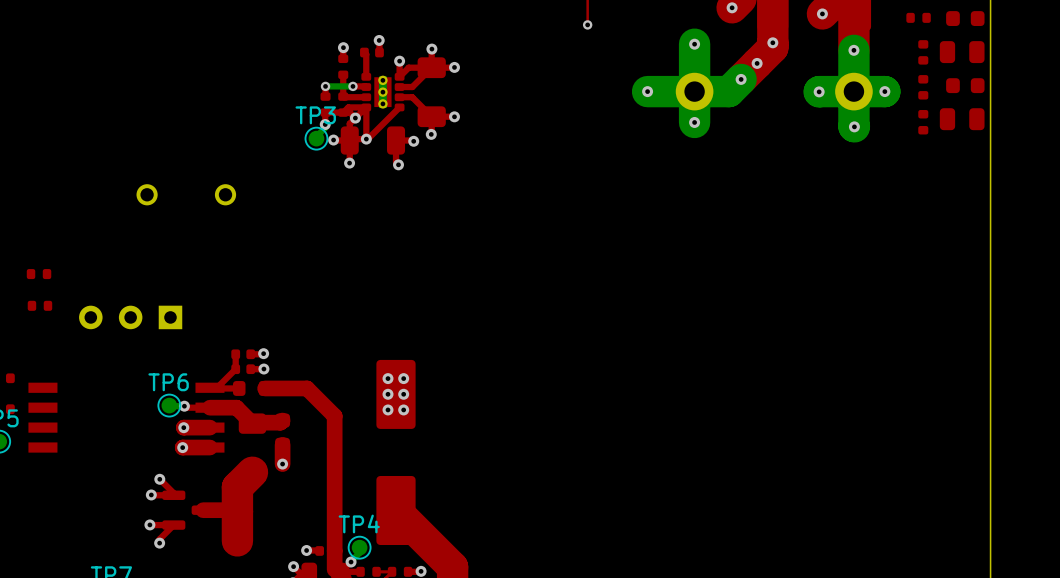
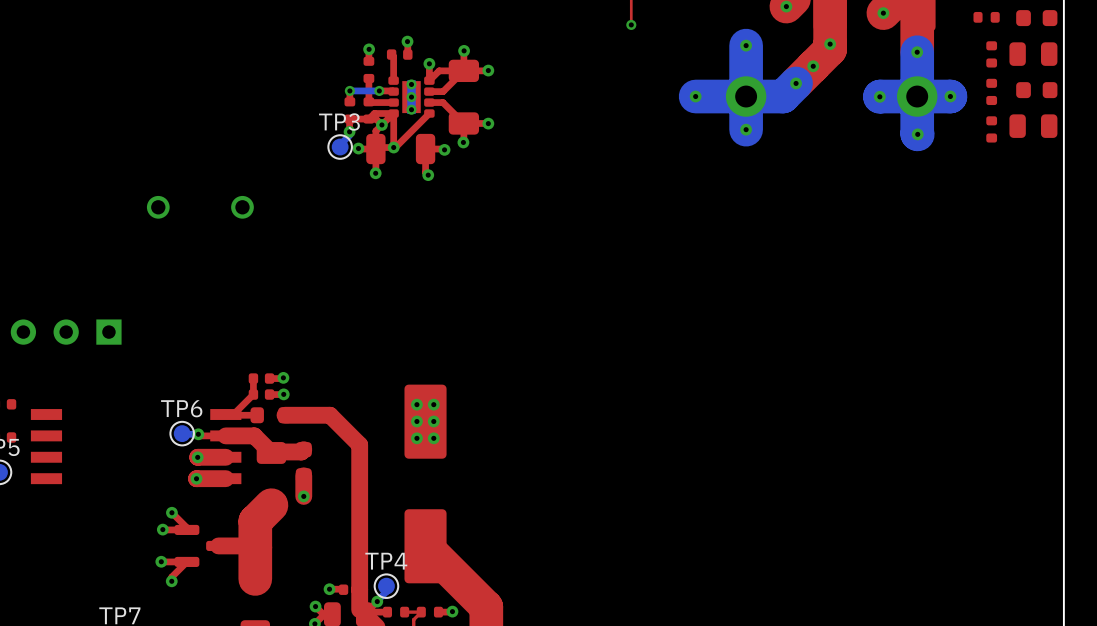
part: (39, 274) -> none
part: (39, 305) -> none
part position: (130, 317) -> (66, 332)

